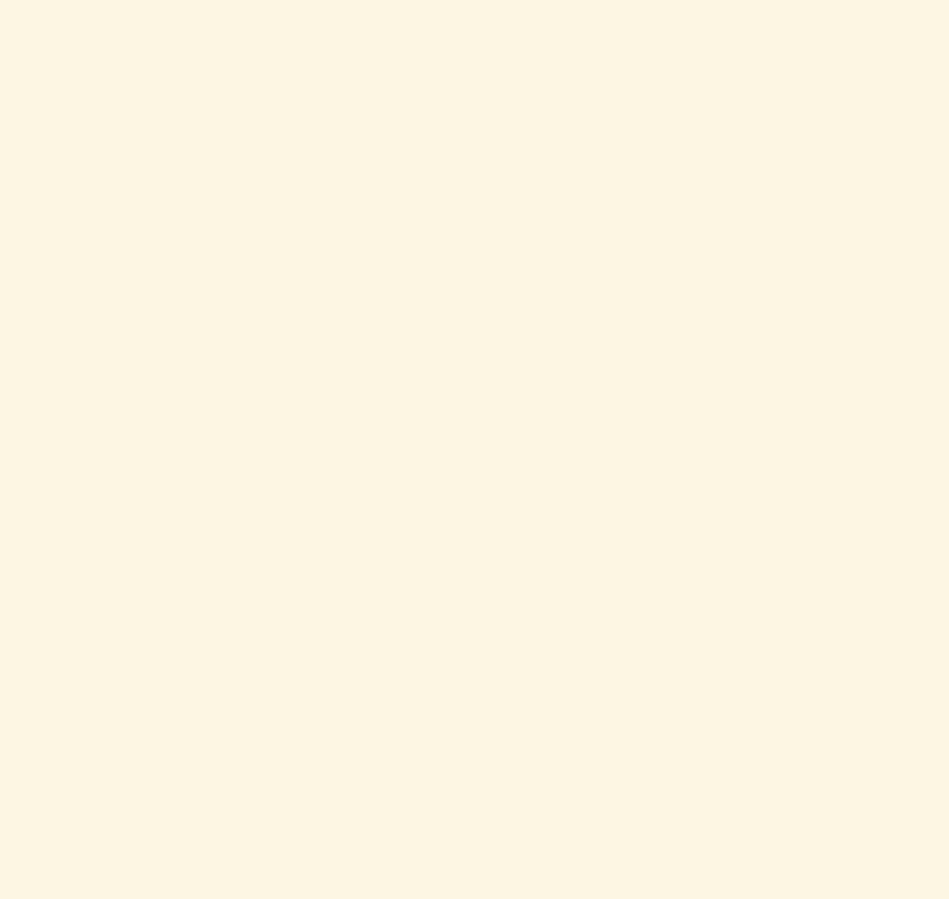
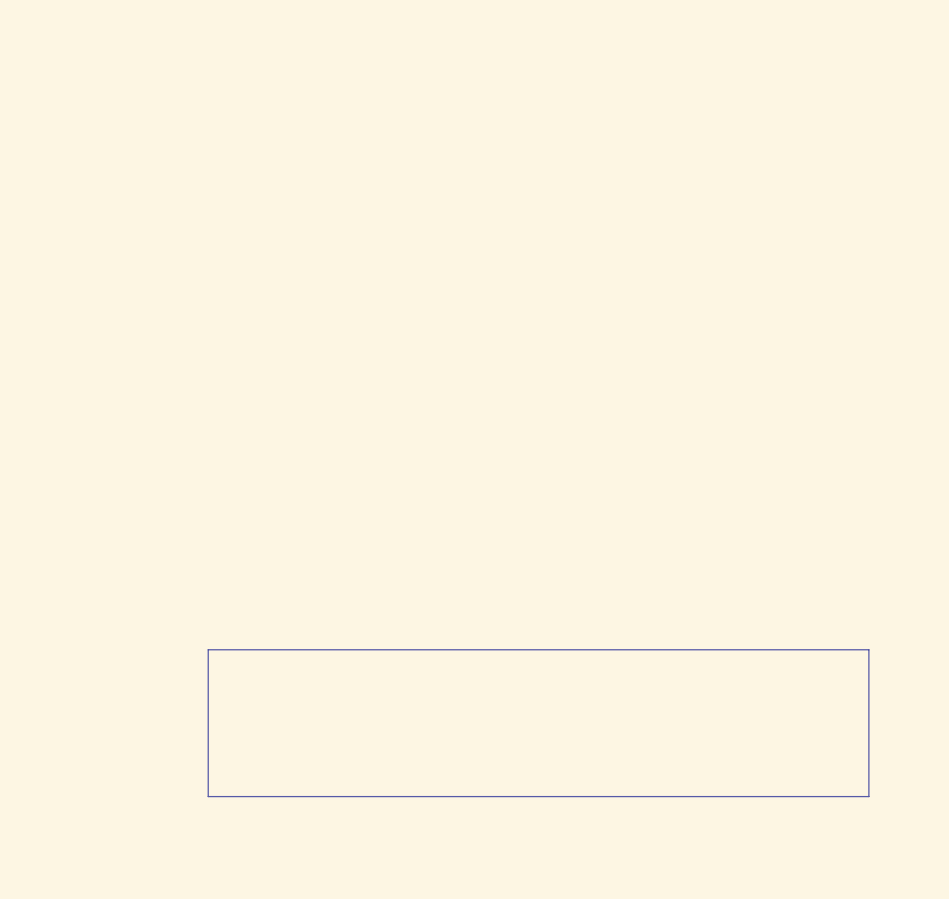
line: none -> (208, 649) (868, 649) (868, 796) (208, 796) (208, 649)

